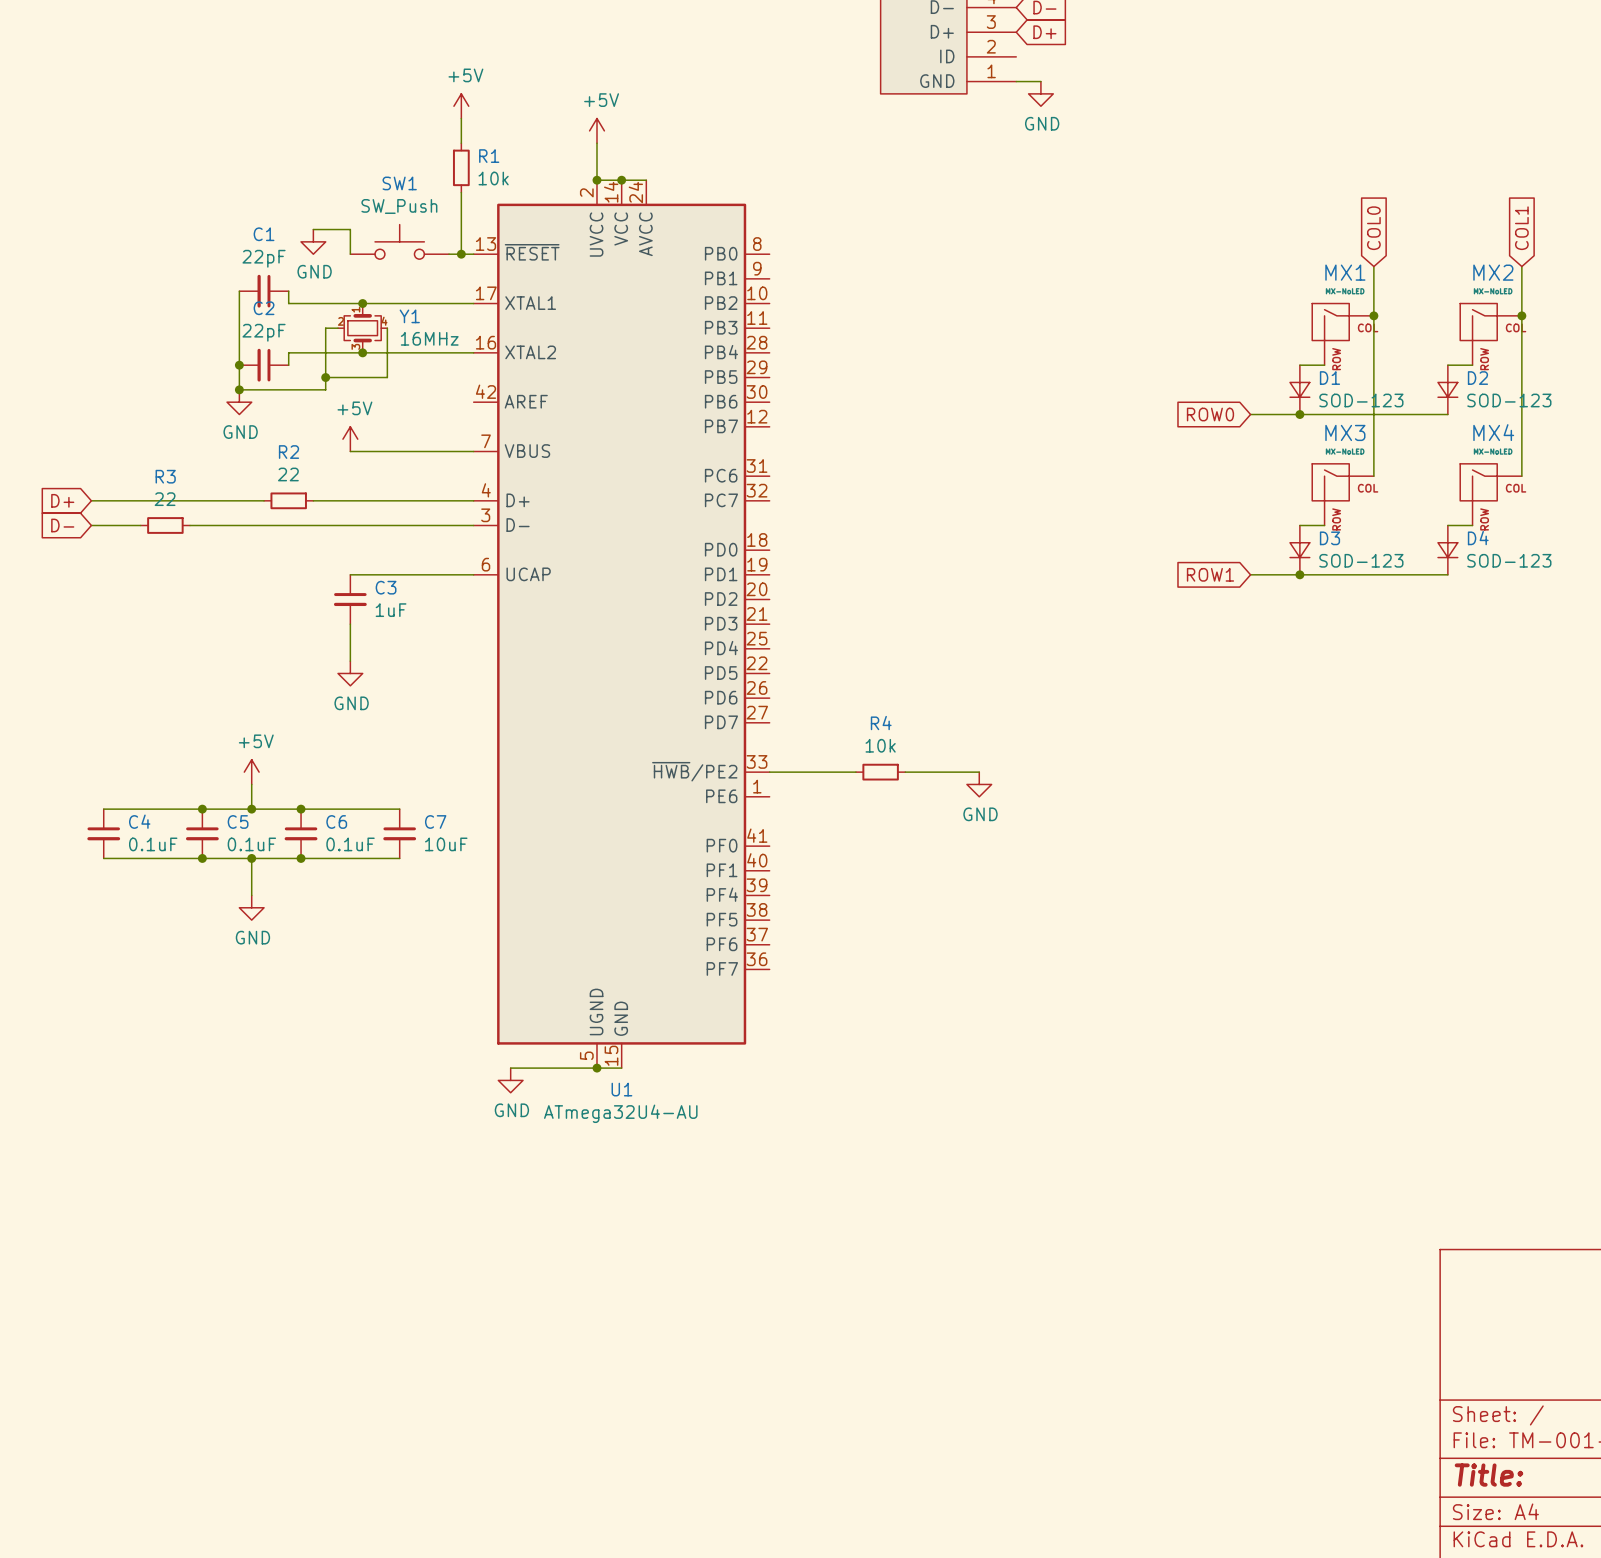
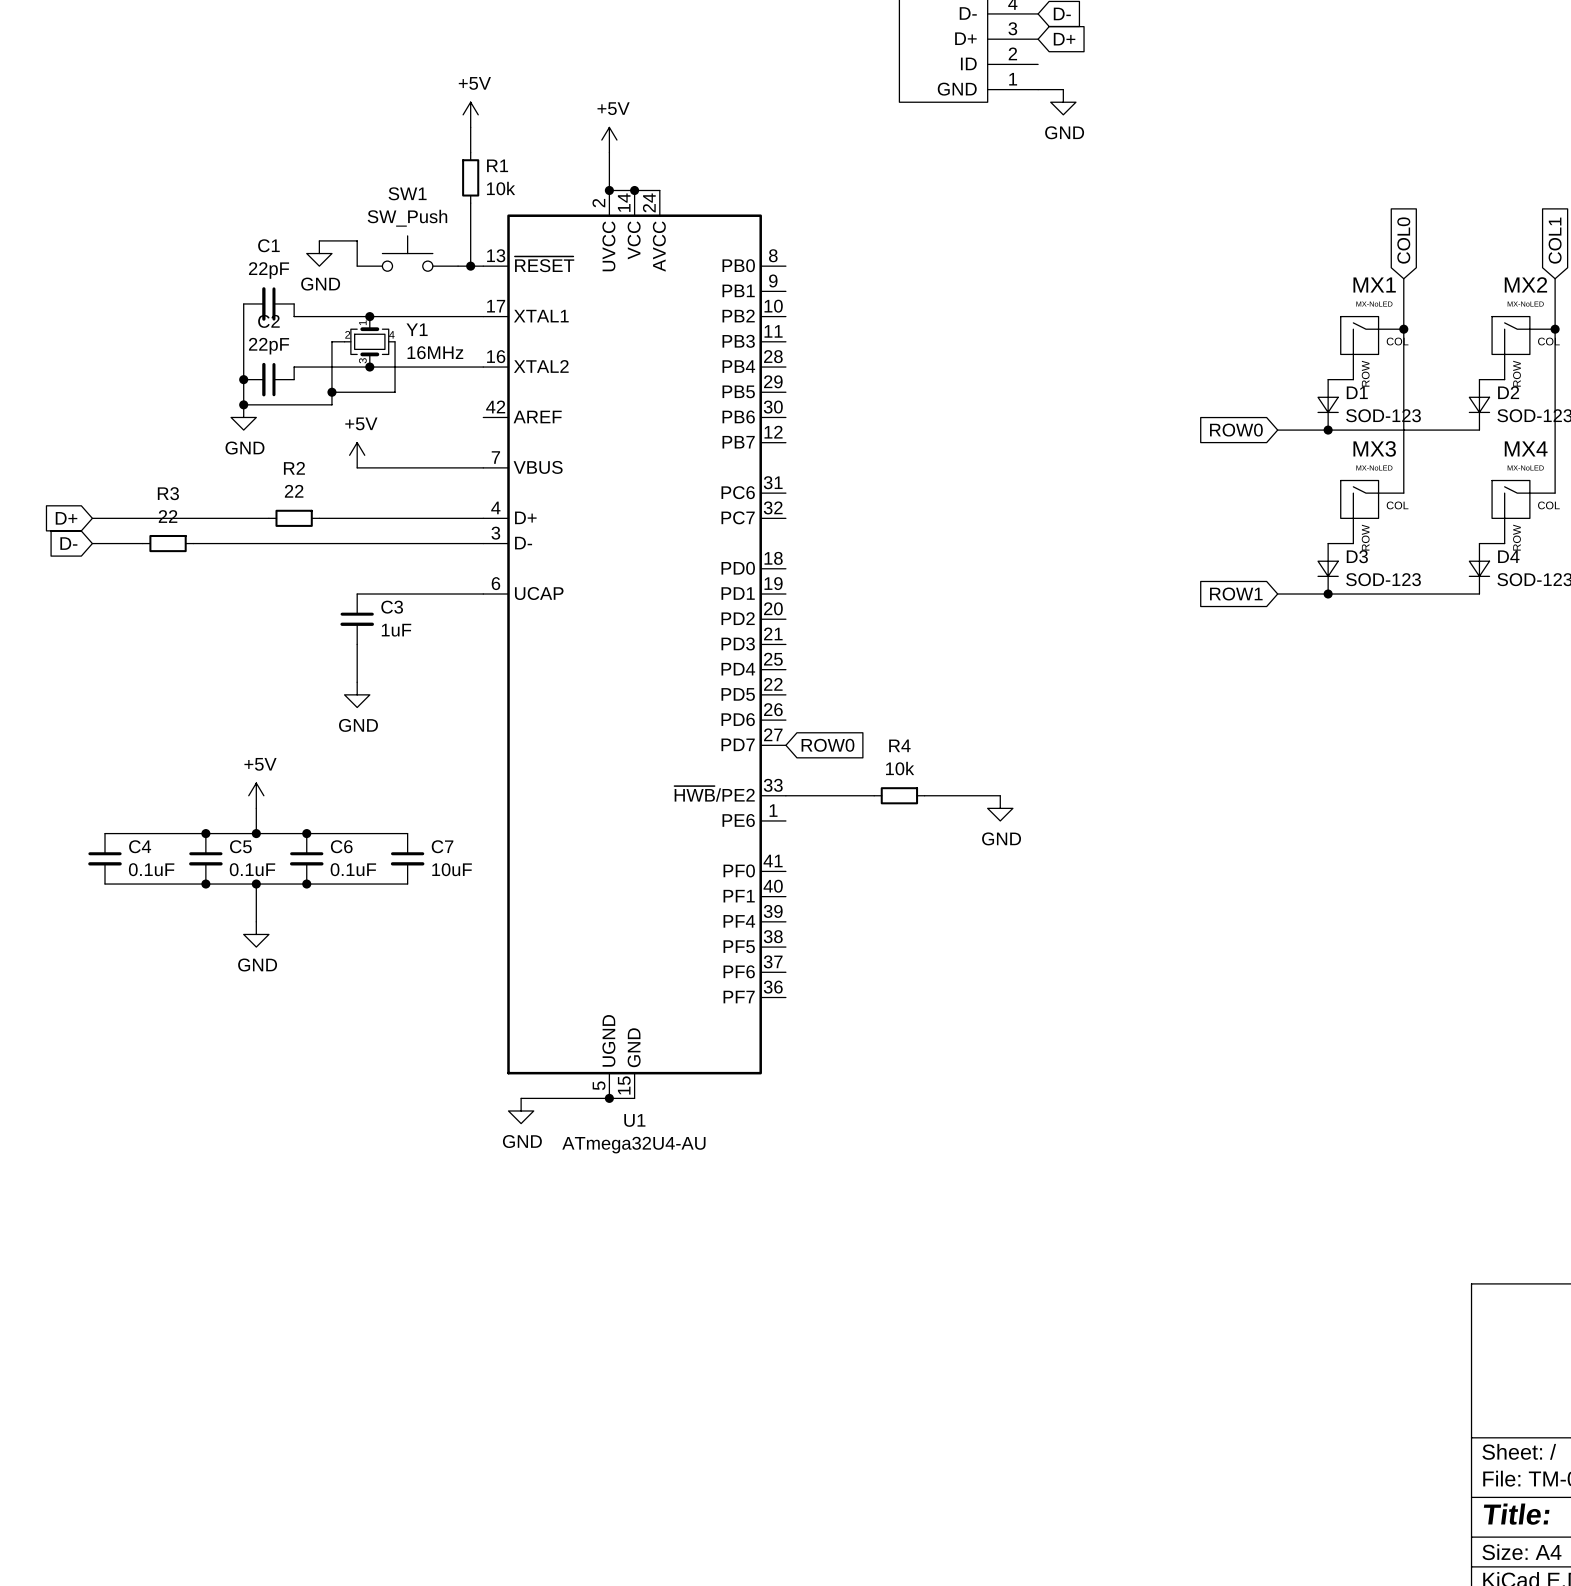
global label: none -> ROW0 (827, 745)

